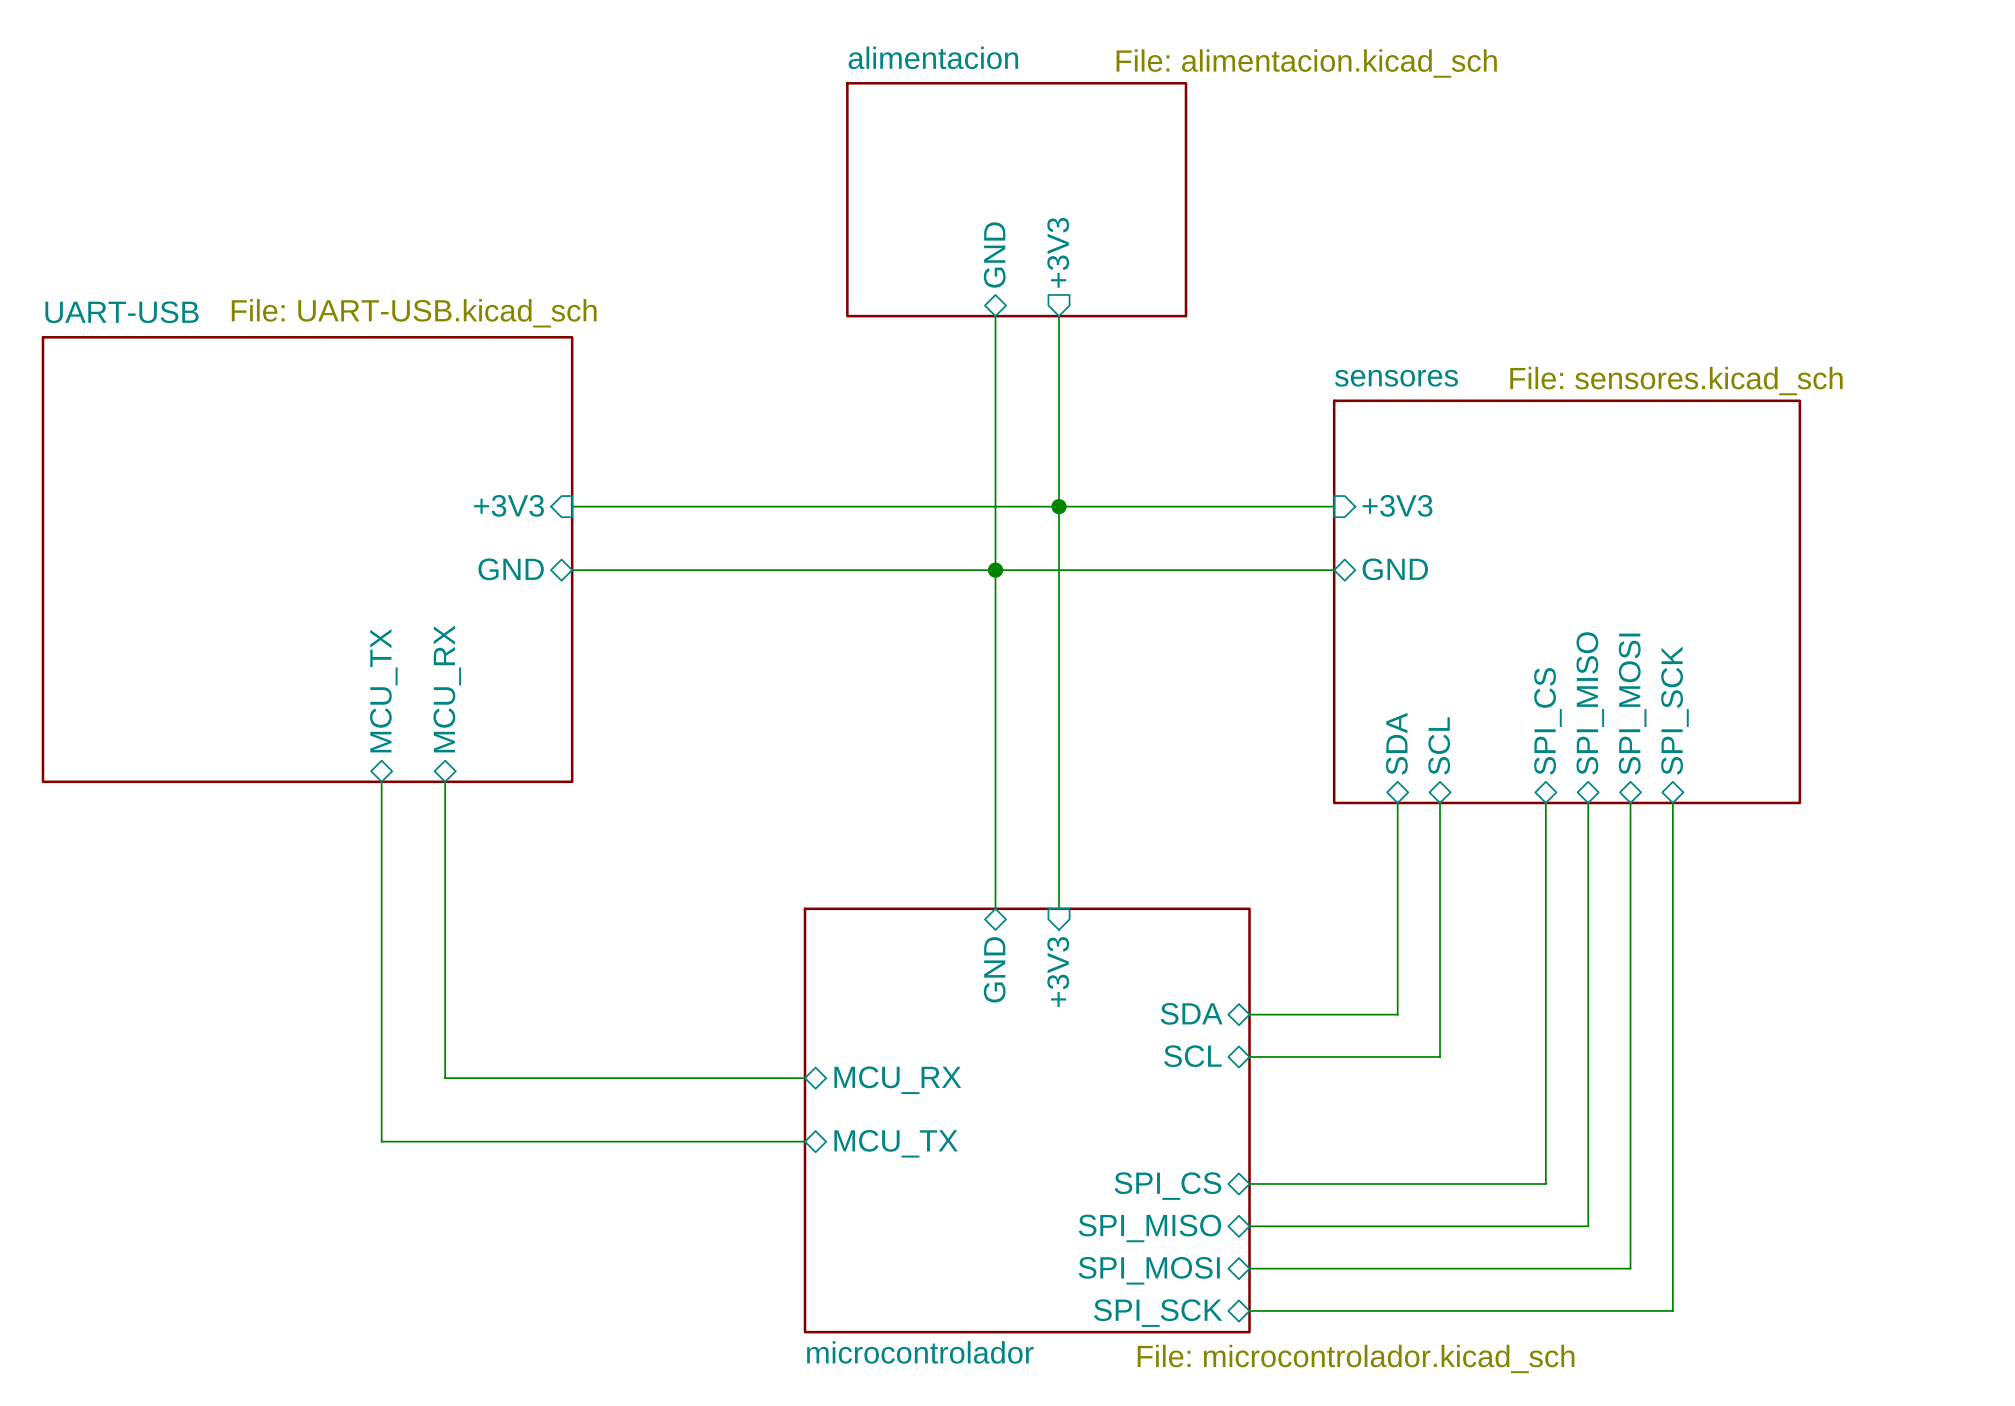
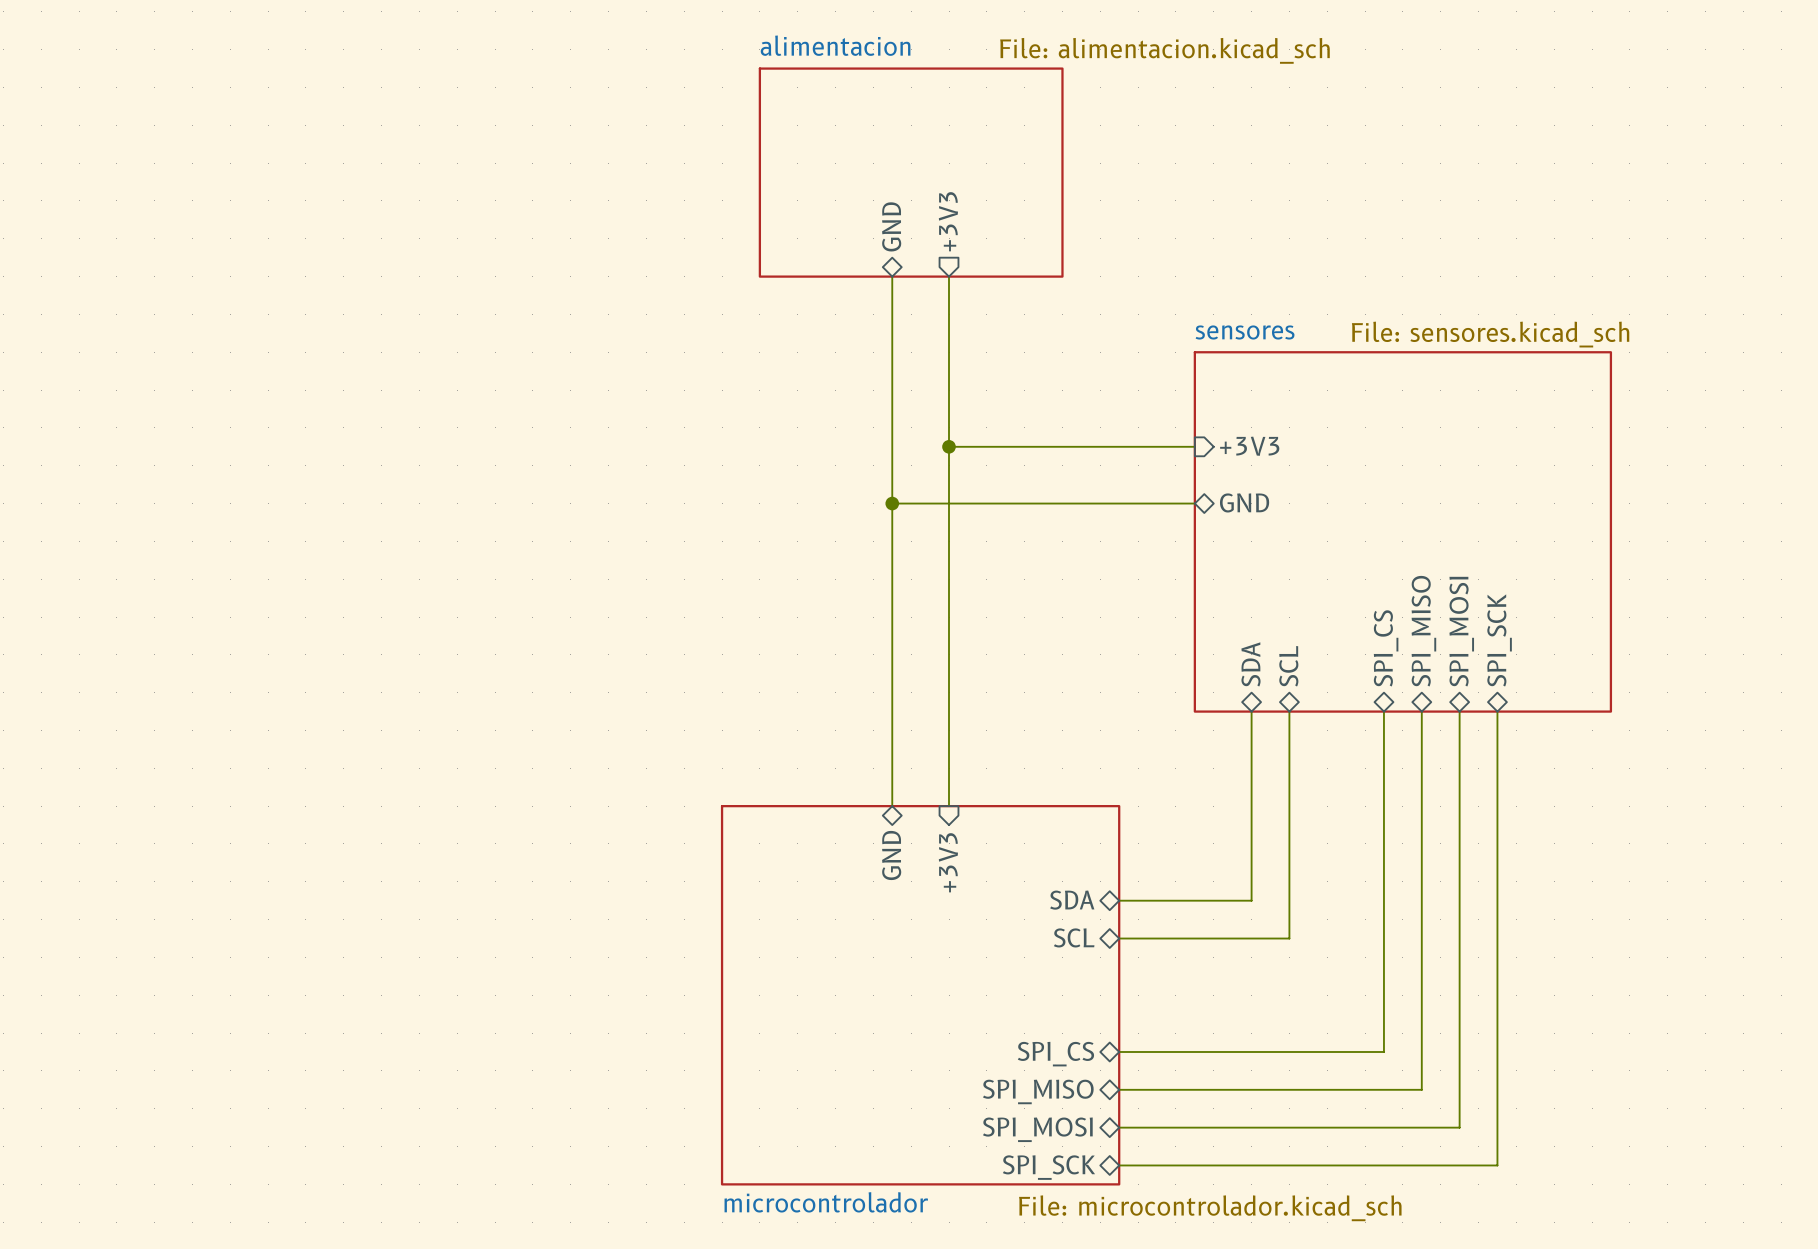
sheet pin: +3V3 (509, 505) -> none
wire: (572, 506) (1059, 506) -> none
sheet UART-USB: File: UART-USB.kicad_sch (307, 559) -> none
sheet pin: GND (511, 569) -> none
wire: (572, 570) (995, 570) -> none
sheet pin: MCU_RX (447, 689) -> none
sheet pin: MCU_TX (383, 690) -> none
wire: (381, 781) (381, 1141) (805, 1141) -> none
wire: (445, 781) (445, 1078) (805, 1078) -> none
sheet pin: MCU_RX (897, 1080) -> none
sheet pin: MCU_TX (896, 1143) -> none

